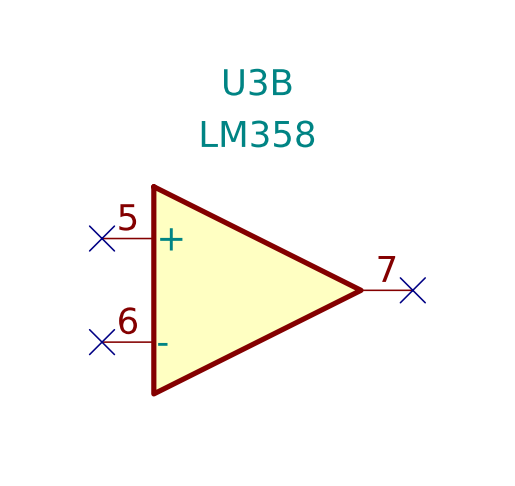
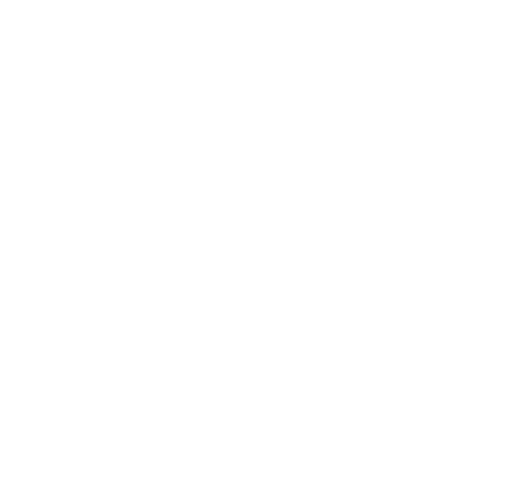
no-connect mark: (102, 238) -> none
U3B: LM358 (257, 290) -> none
no-connect mark: (412, 290) -> none
no-connect mark: (102, 342) -> none

